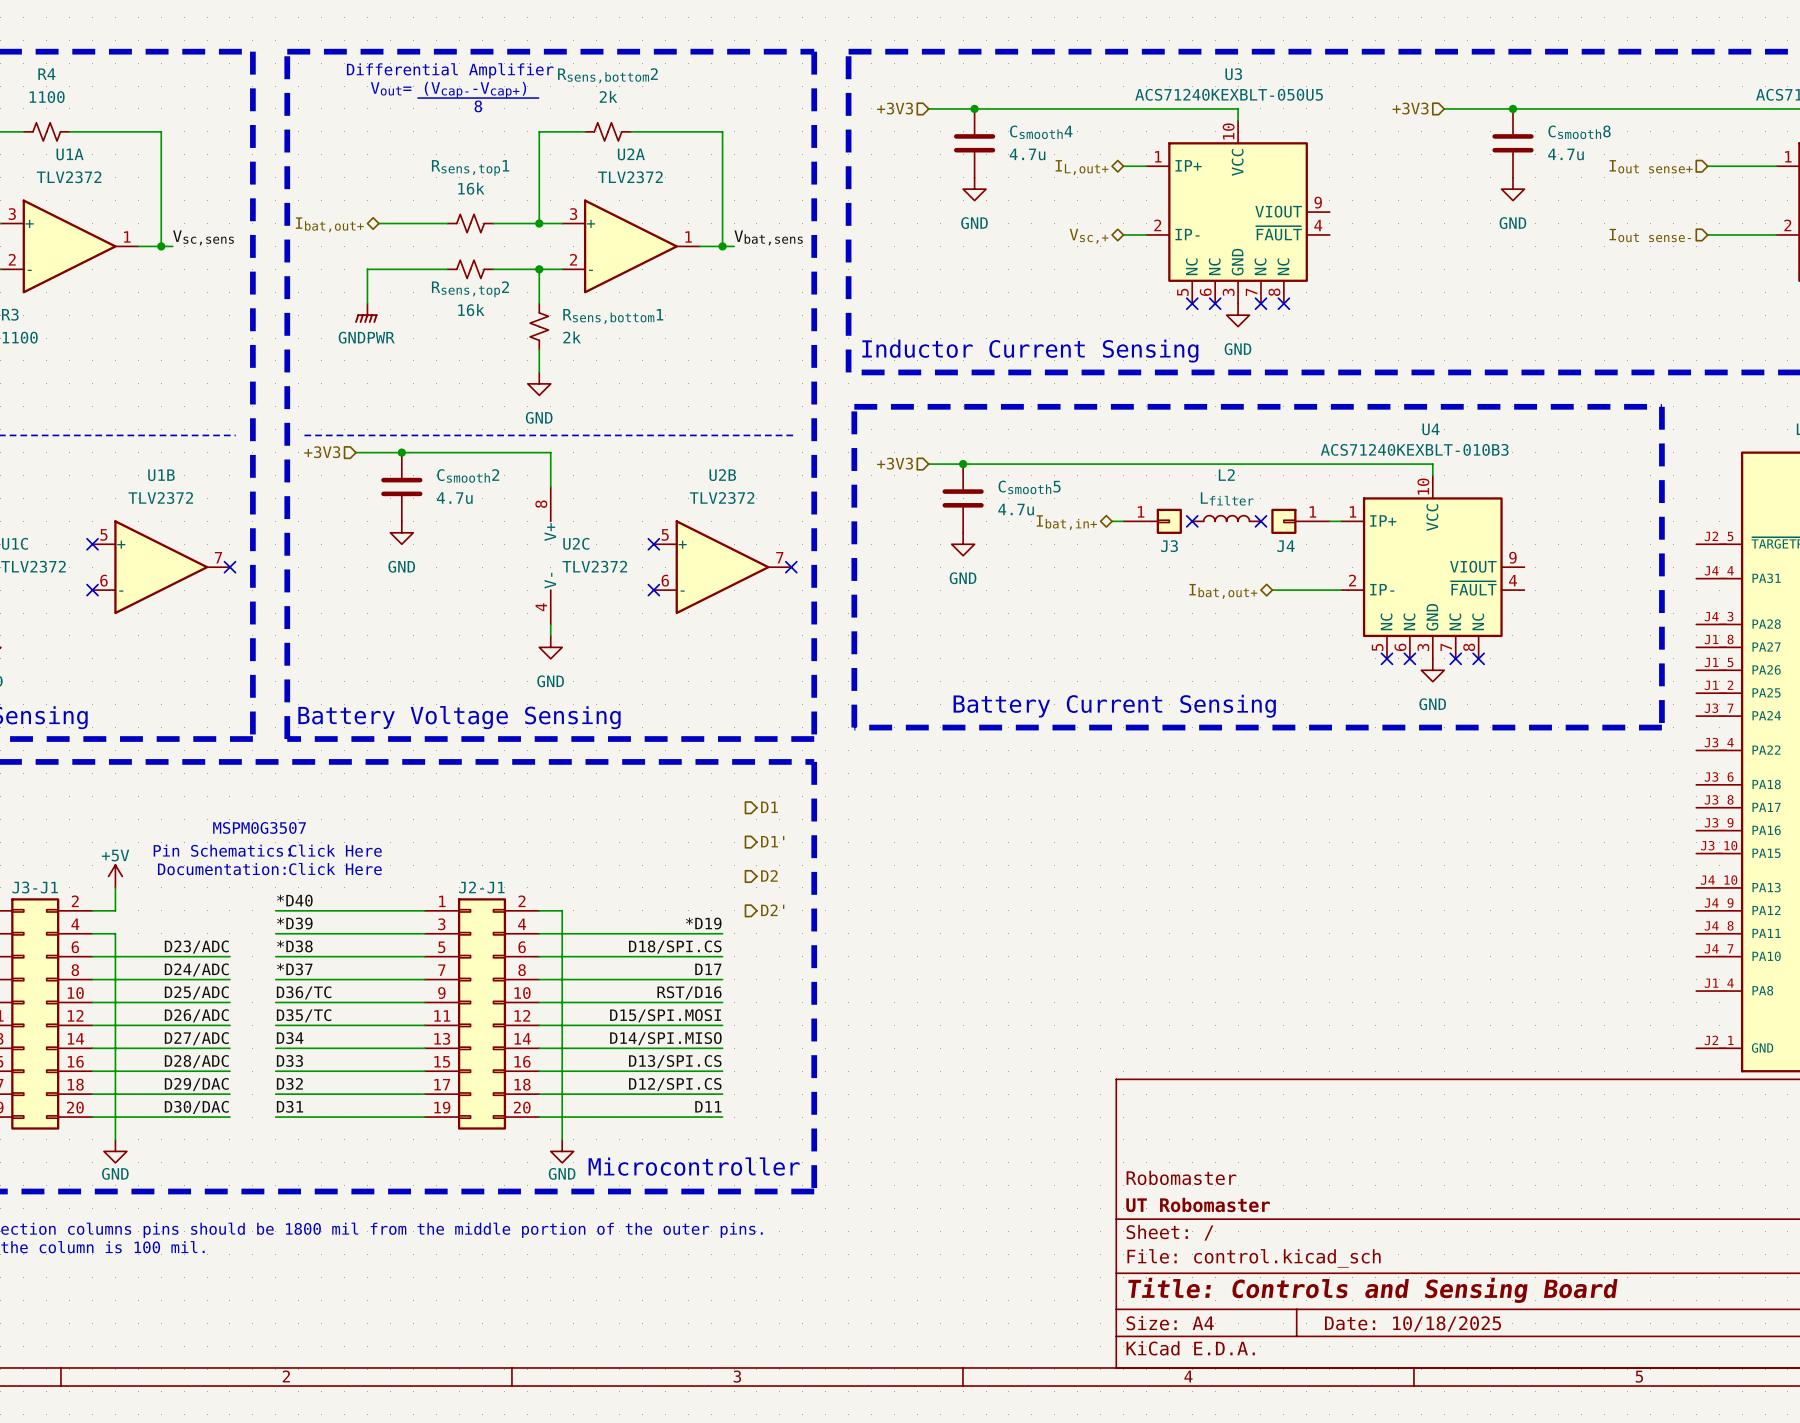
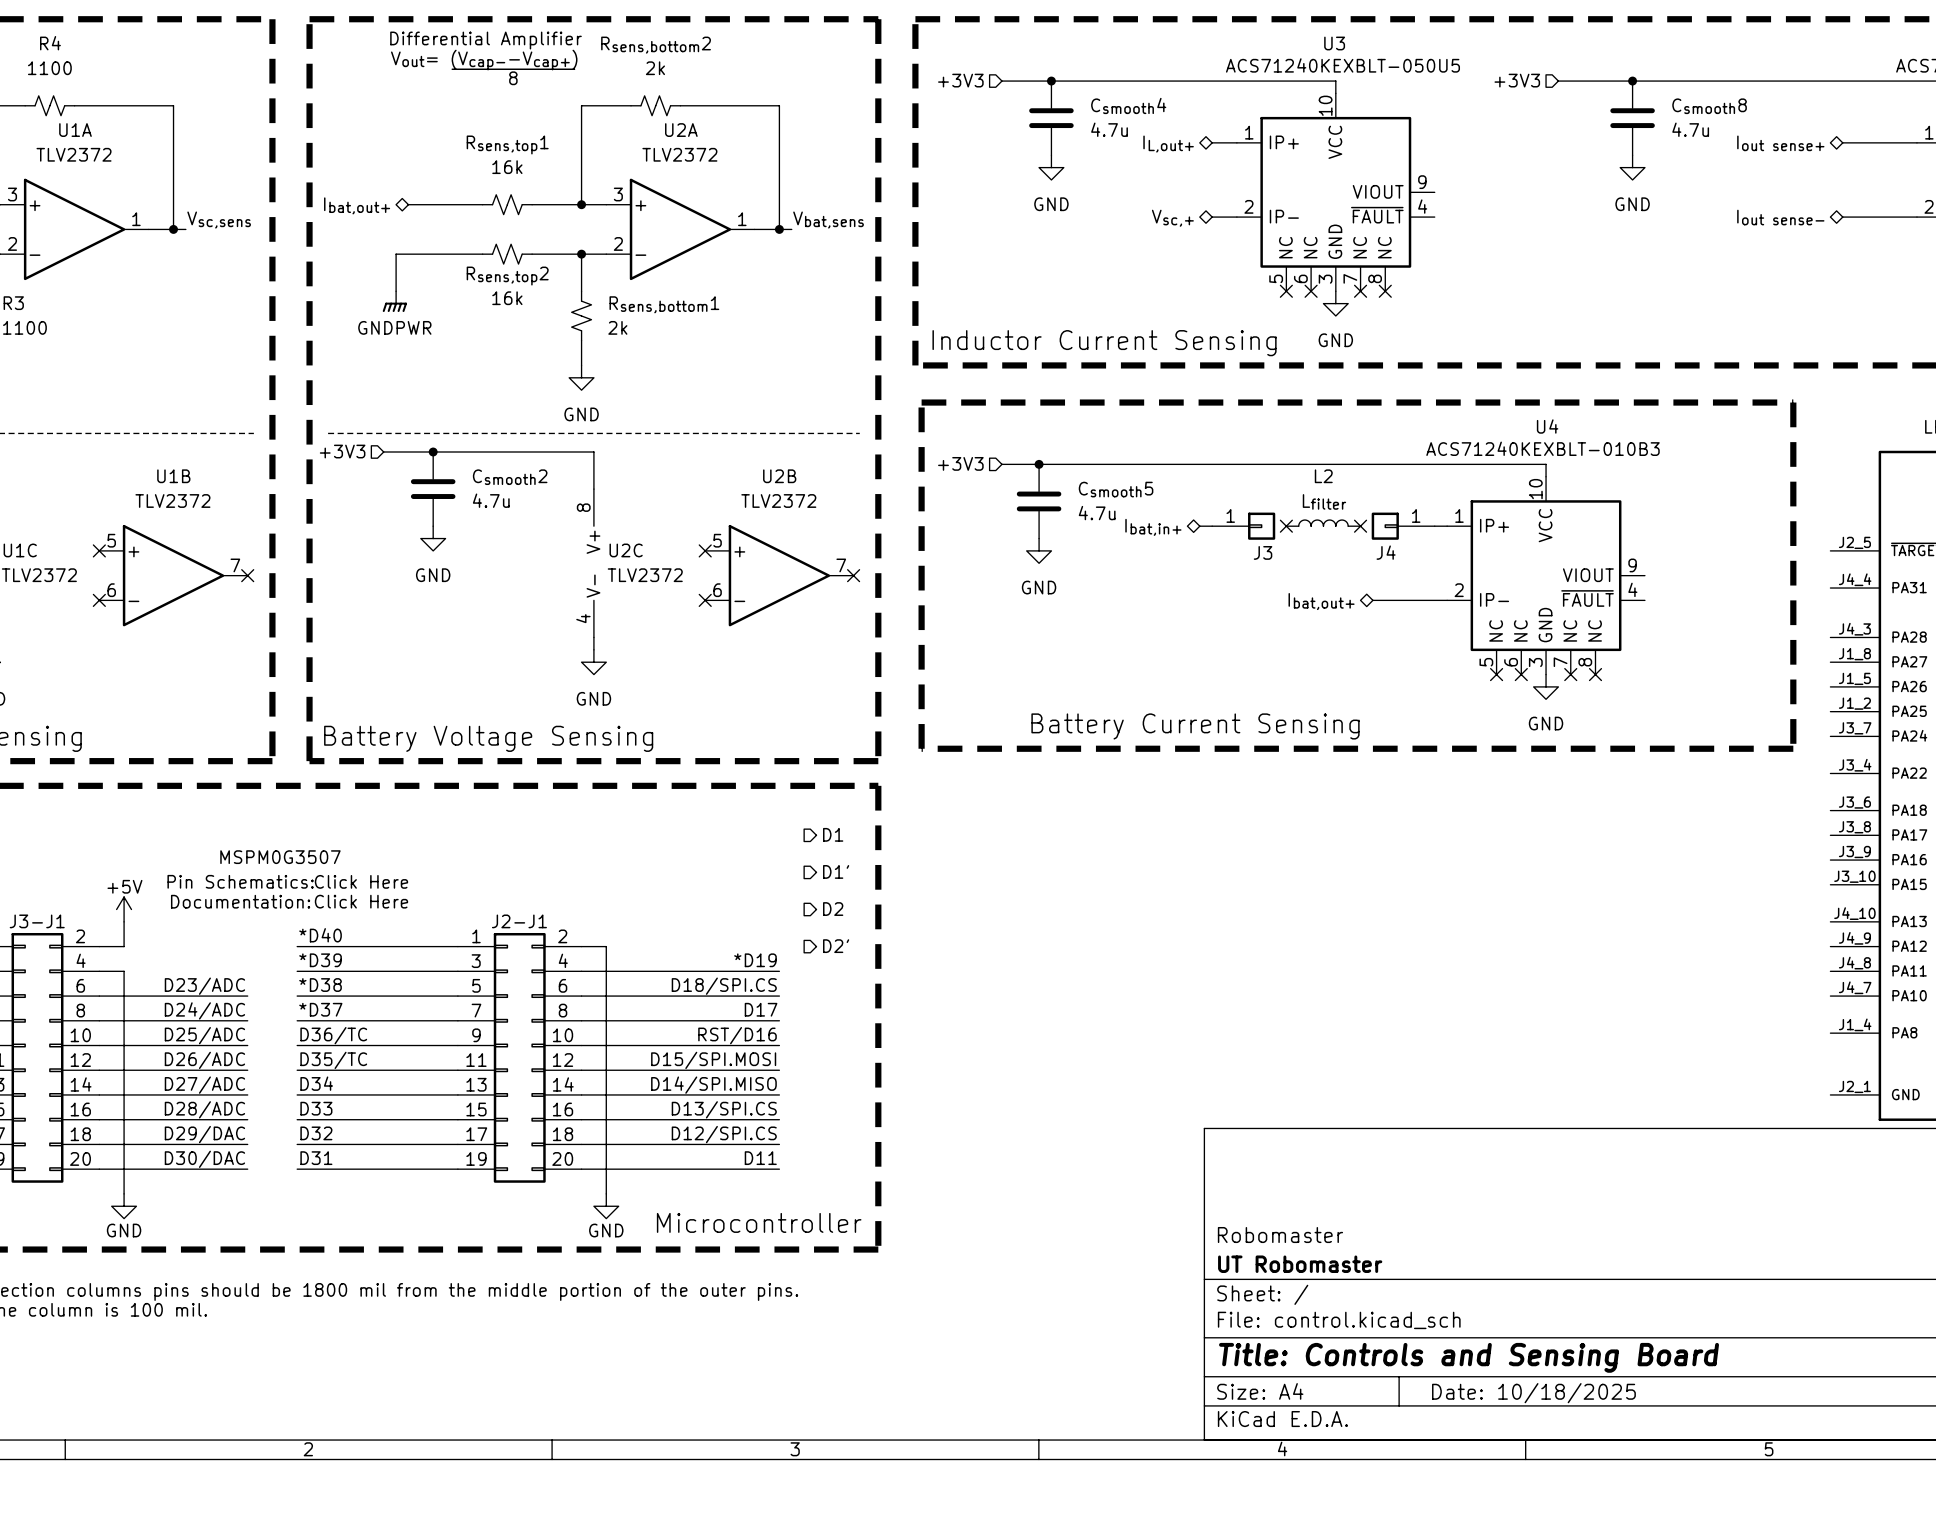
hierarchical label shape: input (1651, 166) -> bidirectional (1780, 143)
hierarchical label shape: input (1650, 235) -> bidirectional (1780, 217)

